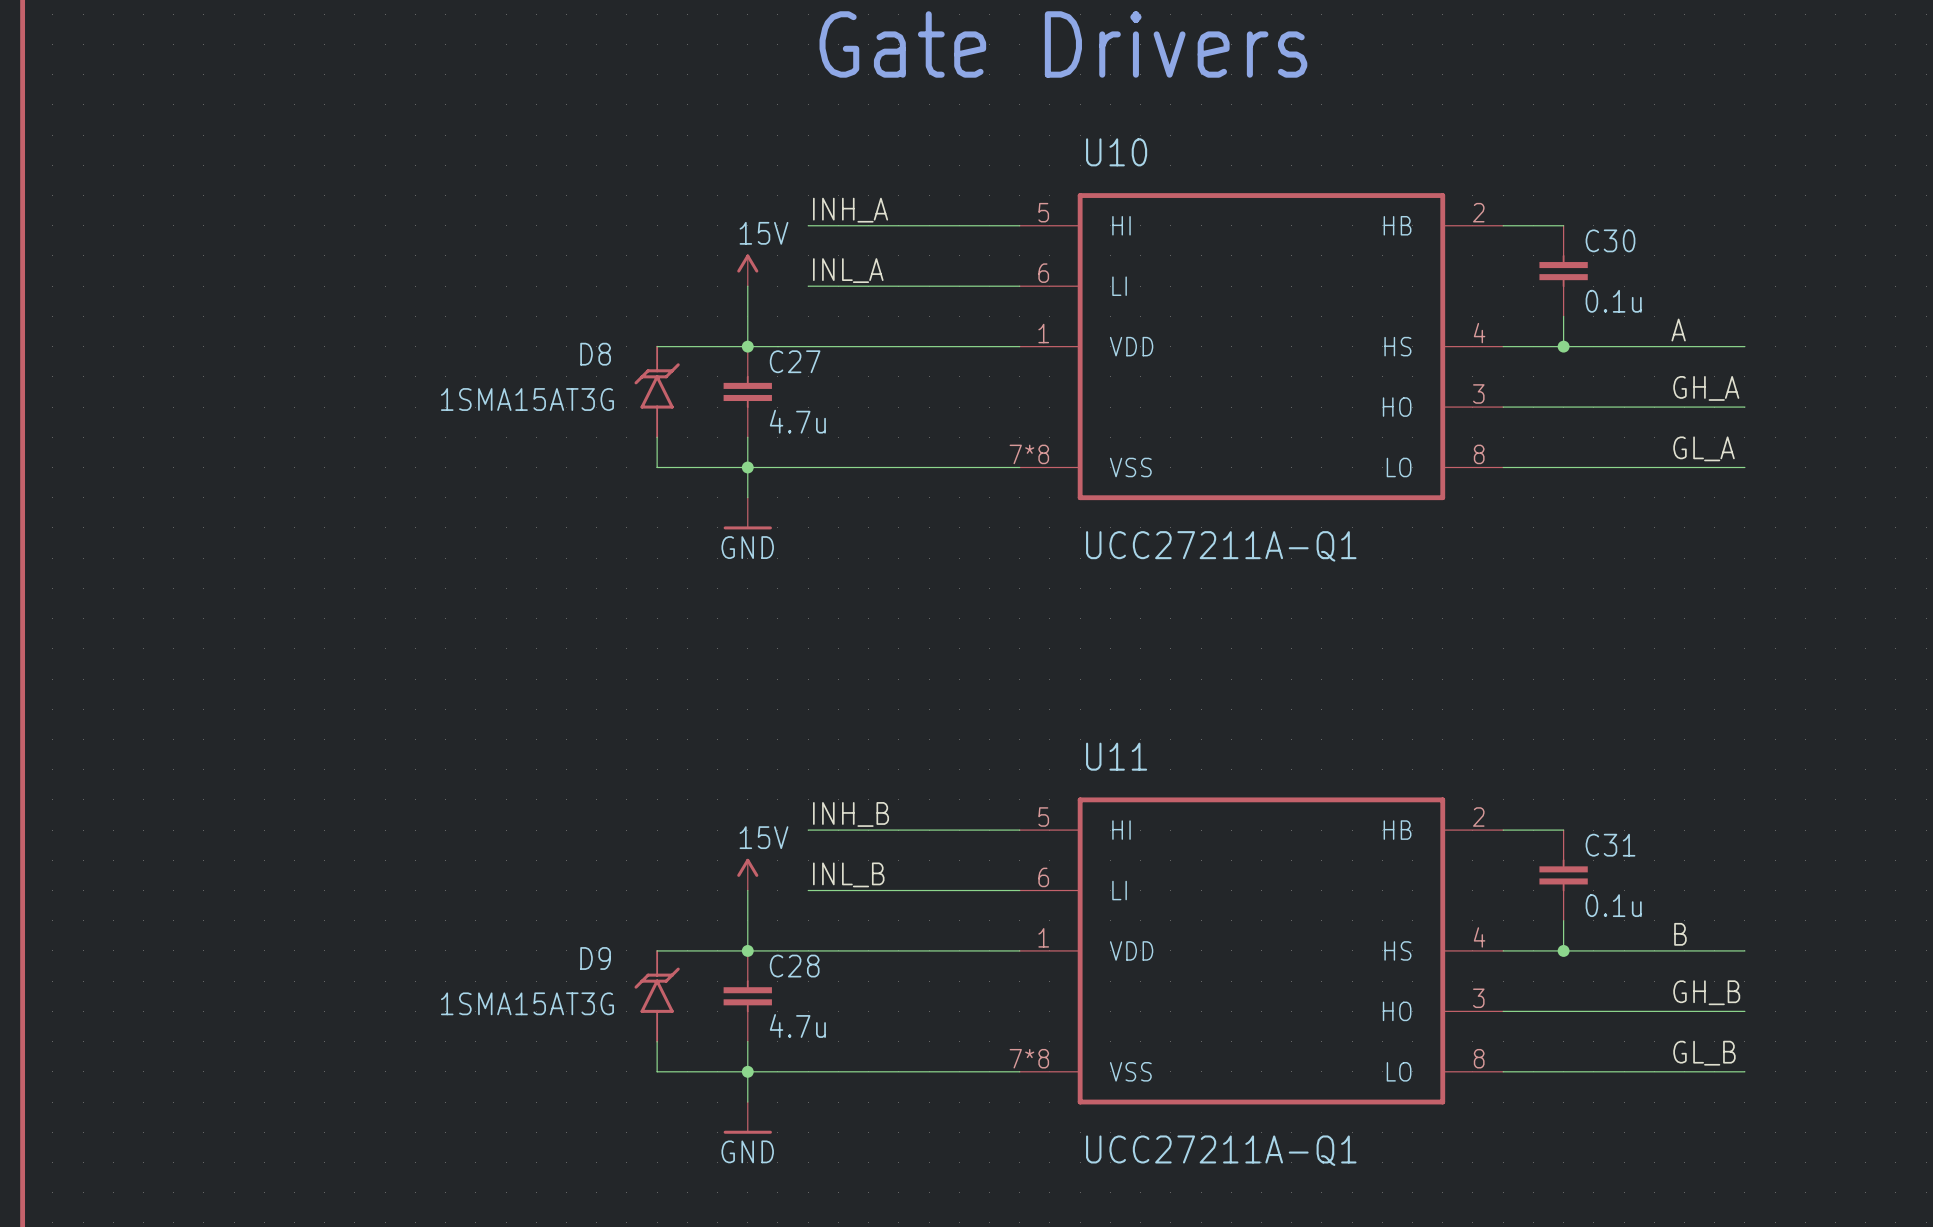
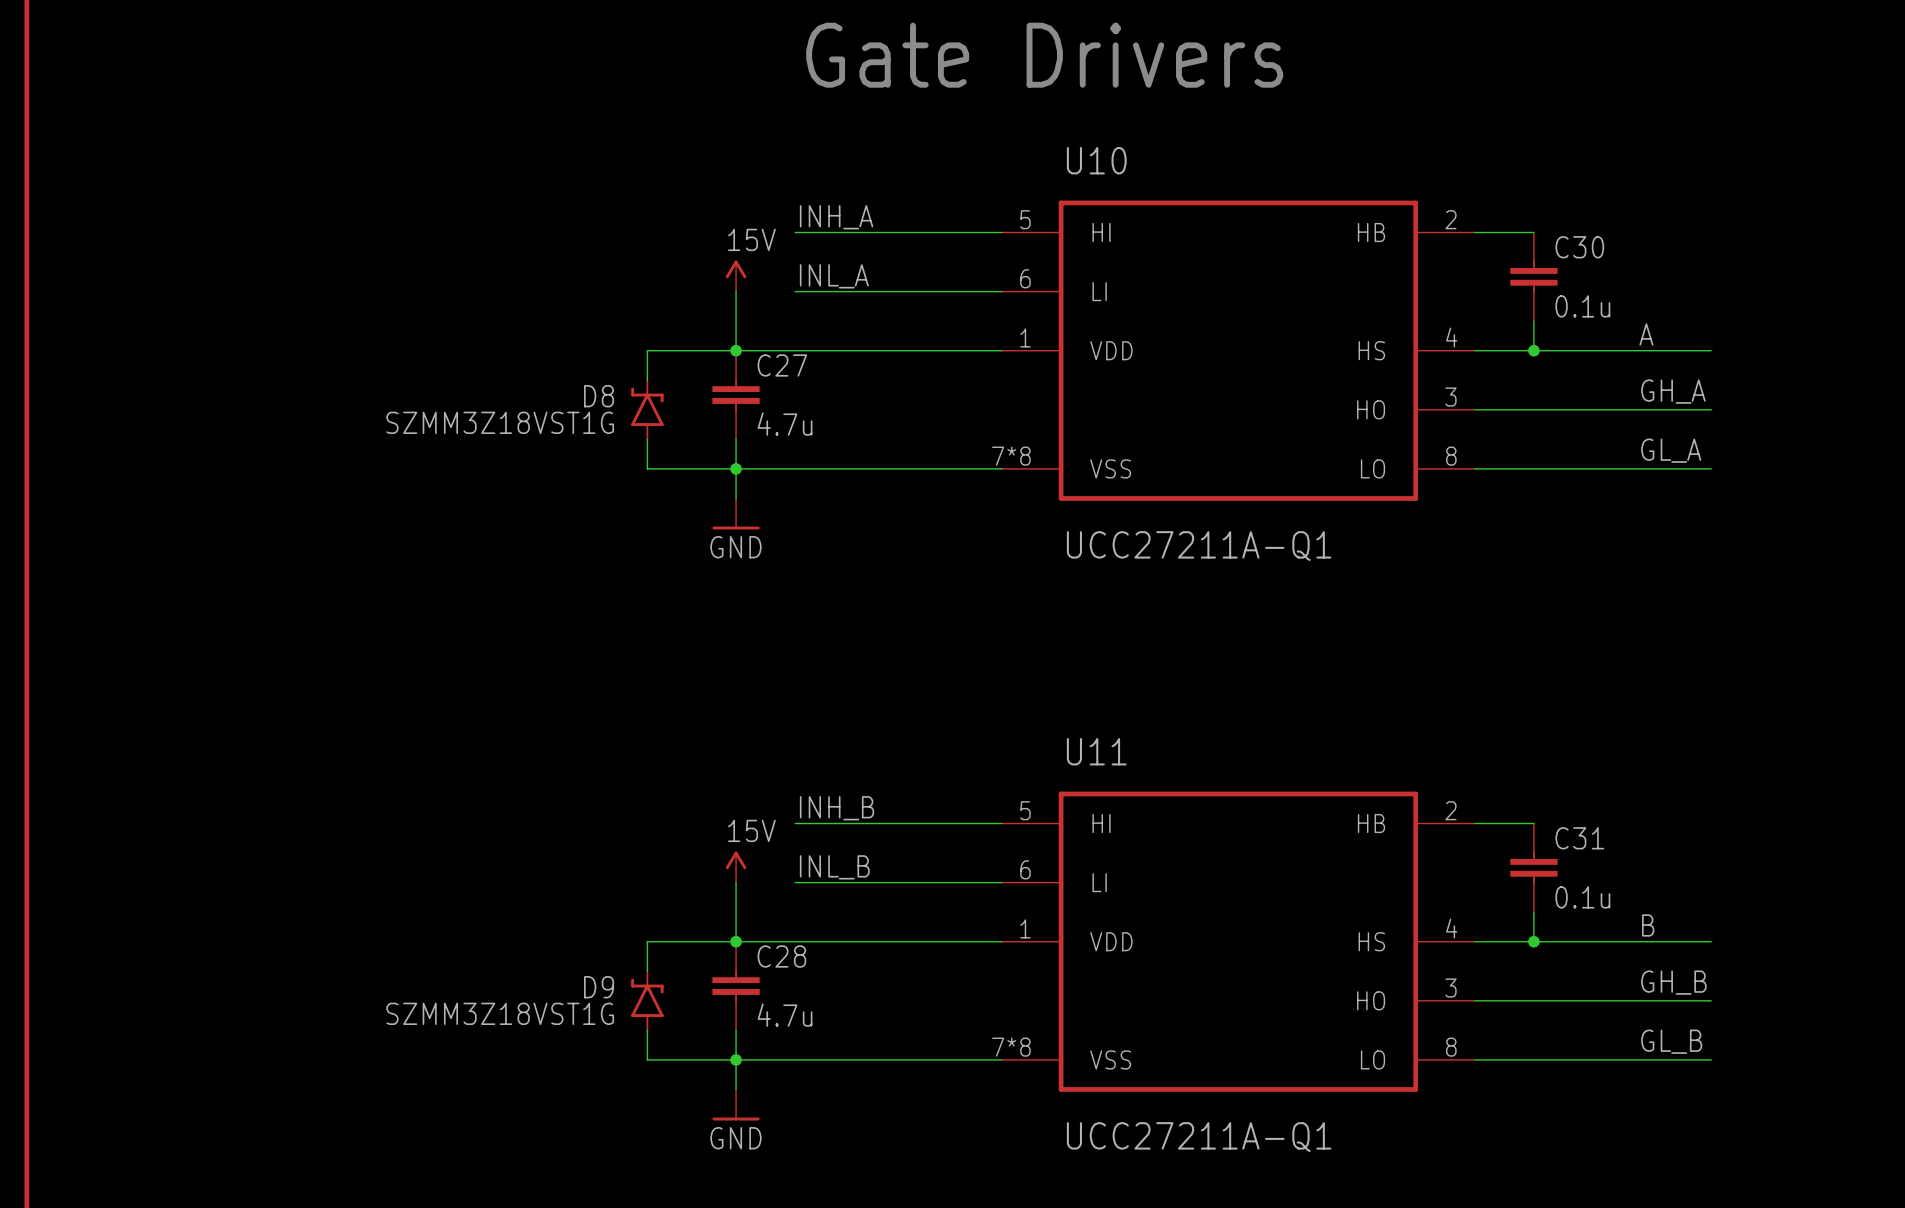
D8 symbol: [634, 345, 680, 439] -> [631, 379, 664, 441]
D8 name position: D8 (595, 354) -> D8 (599, 396)
D8 value: 1SMA15AT3G (527, 399) -> SZMM3Z18VST1G (500, 422)
D9 symbol: [634, 950, 680, 1043] -> [631, 970, 664, 1032]
D9 name position: D9 (595, 958) -> D9 (599, 987)
D9 value: 1SMA15AT3G (527, 1003) -> SZMM3Z18VST1G (500, 1013)

